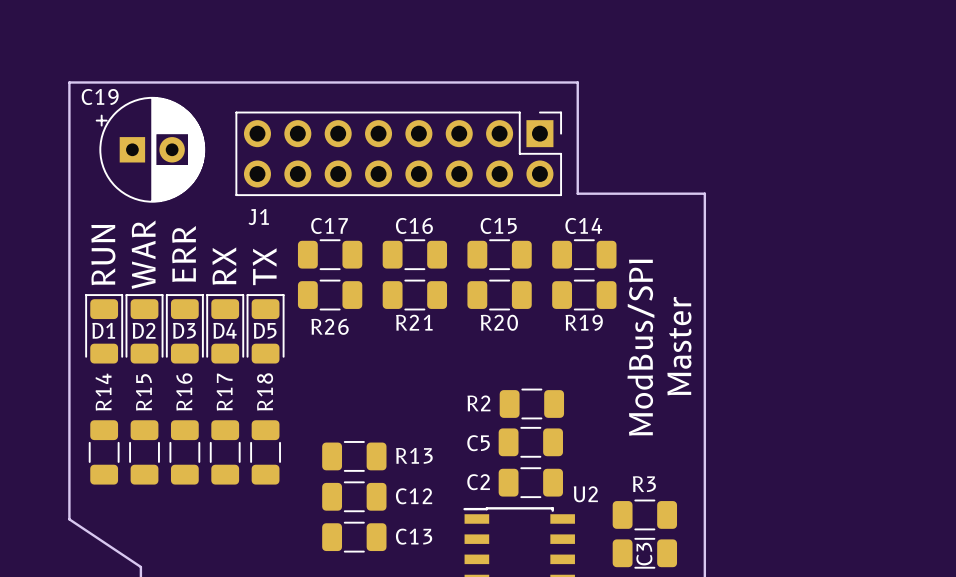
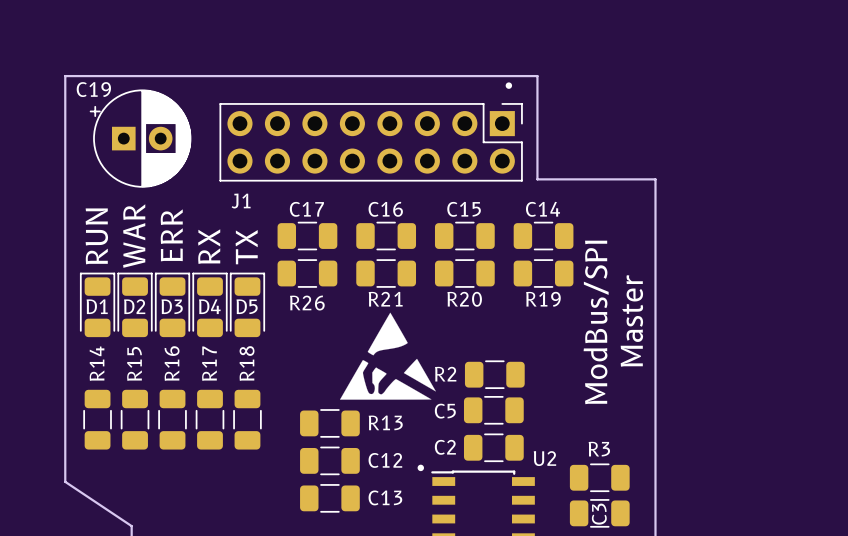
text: none -> . (508, 85)
drawing: none -> [339, 312, 436, 400]
text: none -> . (420, 467)

